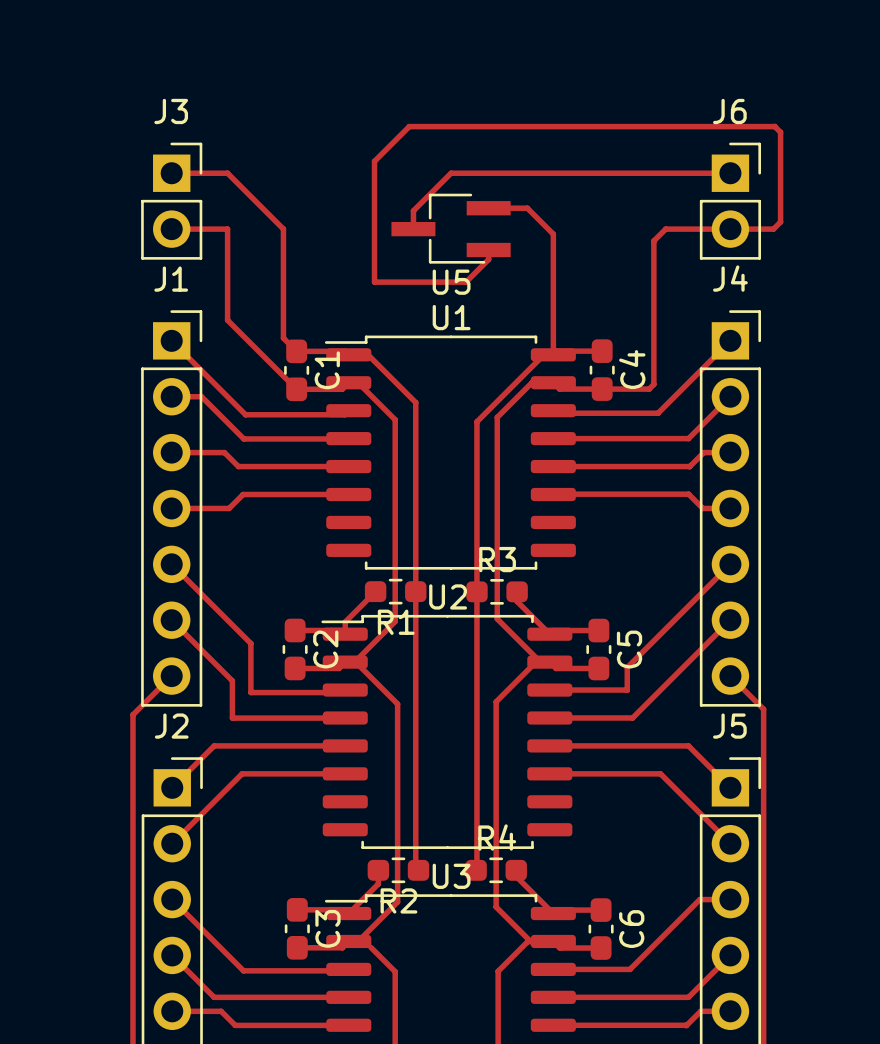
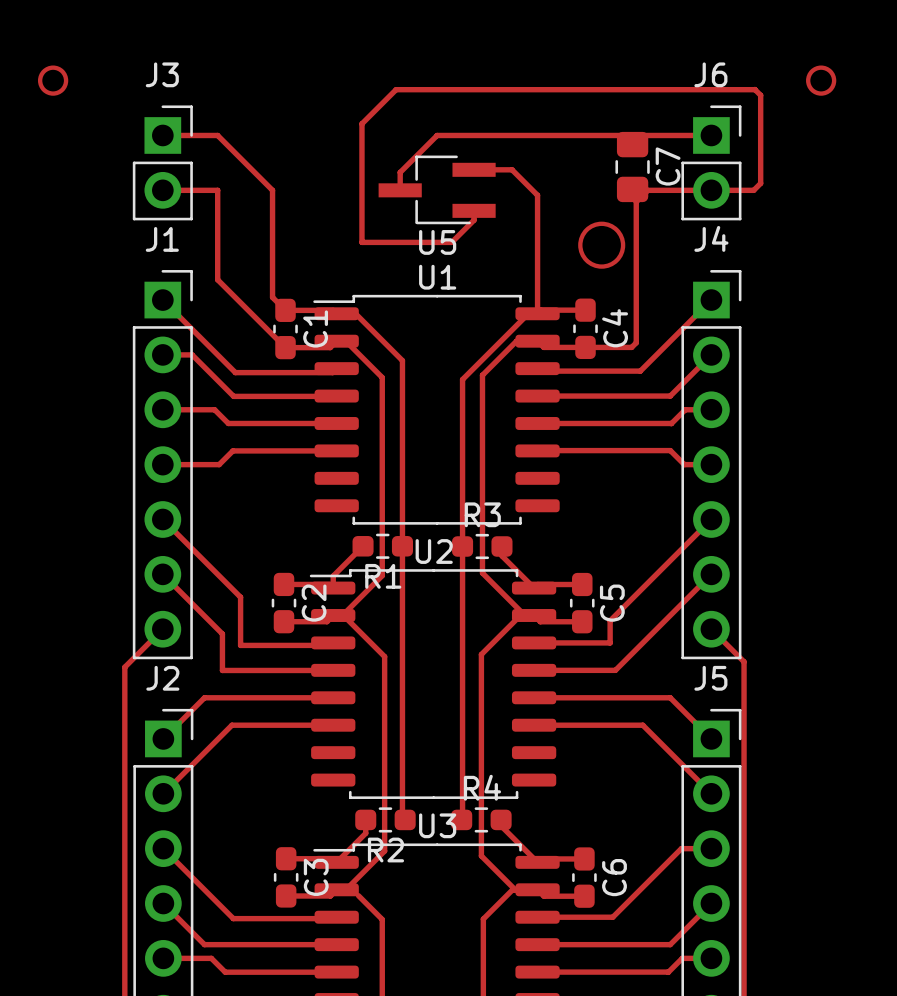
drawing: none -> [37, 65, 69, 96]
drawing: none -> [806, 65, 837, 96]
C7: none -> (632, 167)
drawing: none -> [578, 221, 626, 269]

